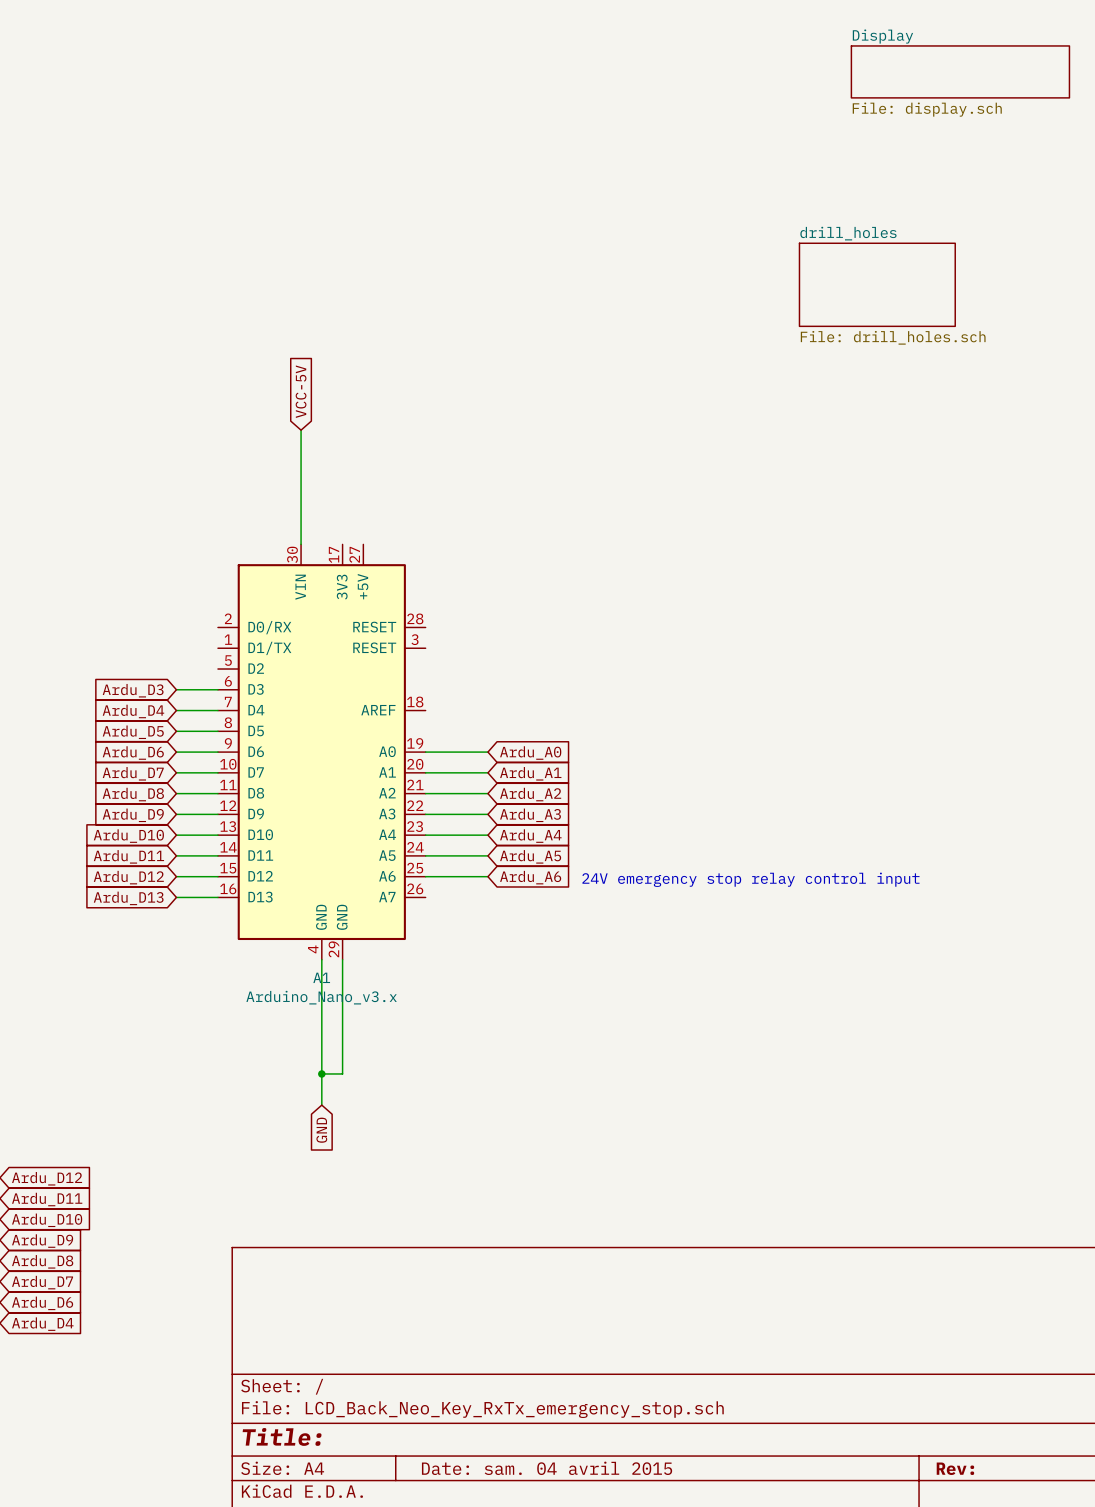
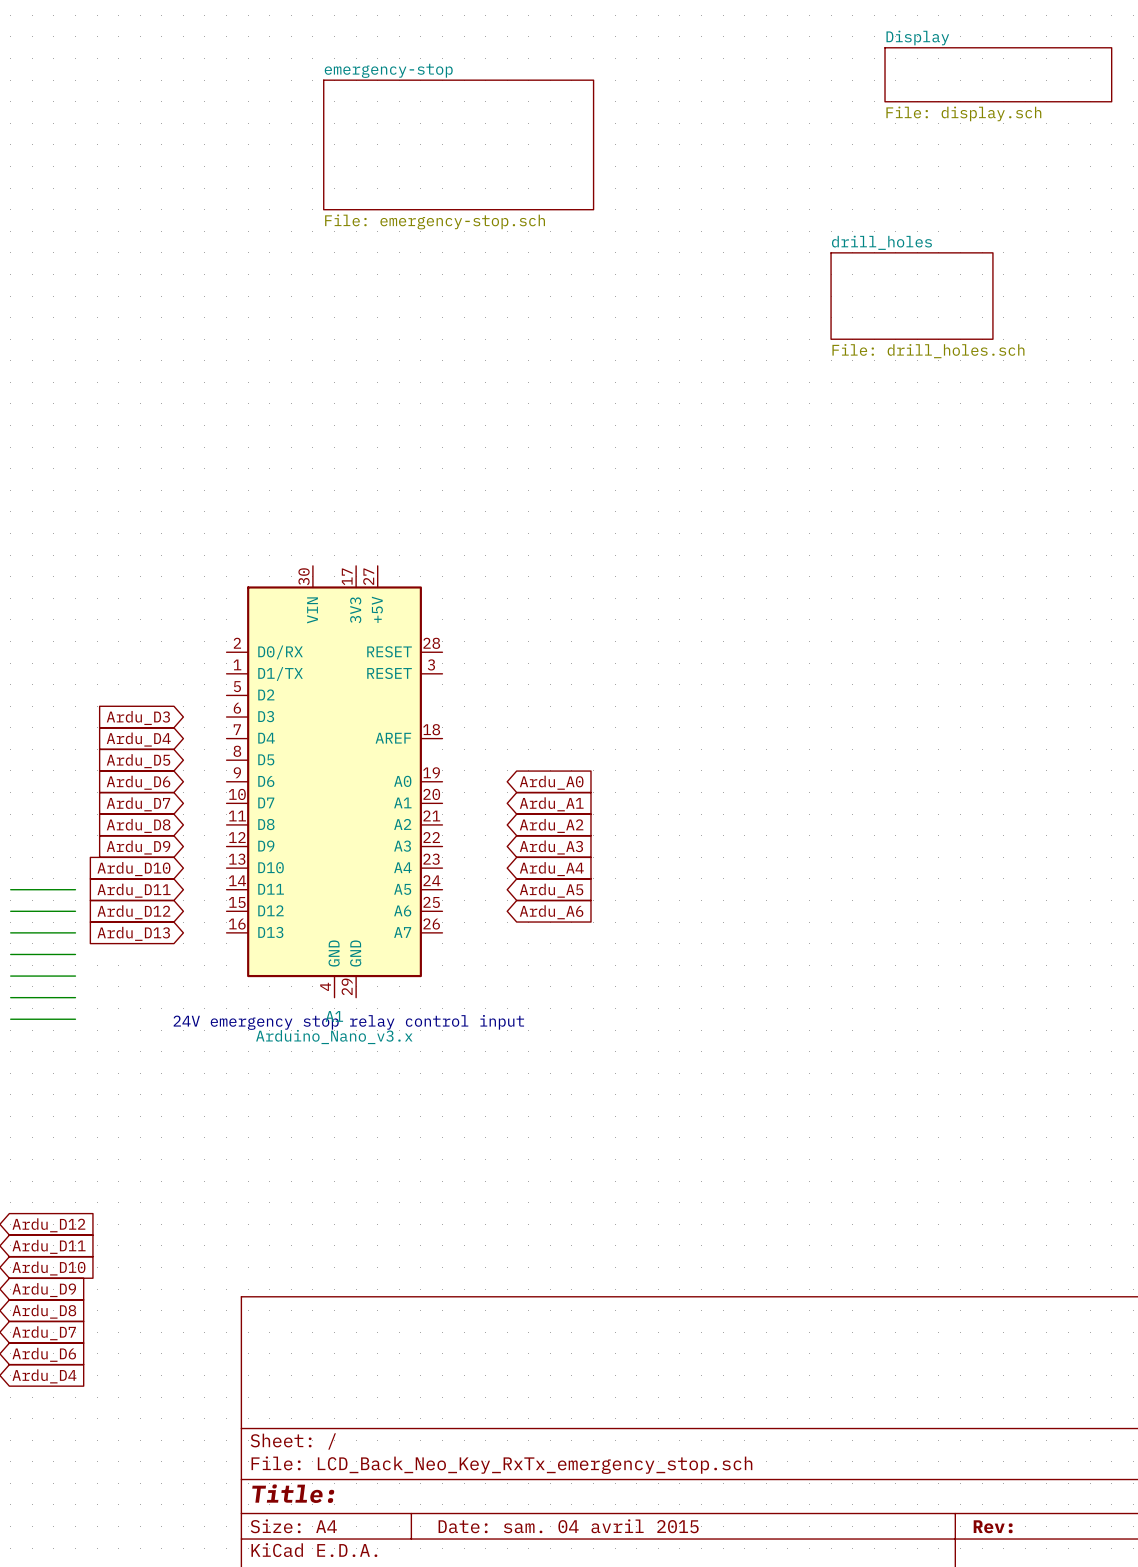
sheet emergency-stop: none -> File: emergency-stop.sch (458, 144)
global label: VCC-5V (301, 391) -> none
wire: (301, 430) (301, 544) -> none
wire: (176, 689) (217, 689) -> none
wire: (176, 710) (217, 710) -> none
wire: (176, 731) (217, 731) -> none
wire: (176, 752) (217, 752) -> none
wire: (425, 752) (487, 752) -> none
wire: (176, 772) (217, 772) -> none
wire: (425, 772) (487, 772) -> none
wire: (176, 793) (217, 793) -> none
wire: (425, 793) (487, 793) -> none
wire: (176, 814) (217, 814) -> none
wire: (425, 814) (487, 814) -> none
wire: (176, 835) (217, 835) -> none
wire: (425, 835) (487, 835) -> none
wire: none -> (10, 889) (75, 889)
wire: (176, 855) (217, 855) -> none
wire: (425, 855) (487, 855) -> none
wire: none -> (10, 911) (75, 911)
wire: (176, 876) (217, 876) -> none
wire: (425, 876) (487, 876) -> none
text: 24V emergency stop relay control input (750, 879) -> none
wire: none -> (10, 932) (75, 932)
wire: (176, 897) (217, 897) -> none
wire: none -> (10, 954) (75, 954)
wire: none -> (10, 976) (75, 976)
wire: none -> (10, 997) (75, 997)
wire: (321, 959) (321, 1105) -> none
wire: (342, 959) (342, 1073) (321, 1073) -> none
wire: none -> (10, 1019) (75, 1019)
text: none -> 24V emergency stop relay control input (348, 1022)
junction: (321, 1073) -> none
global label: GND (321, 1130) -> none

